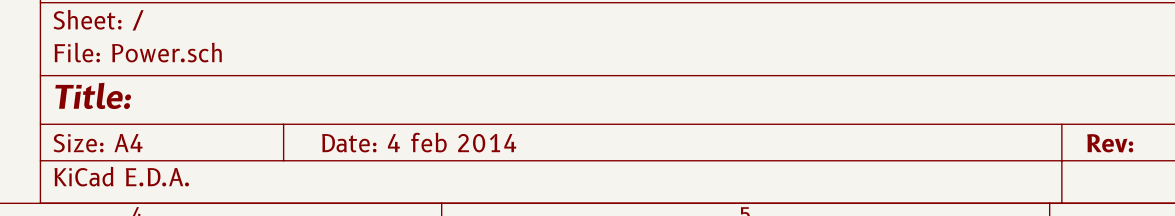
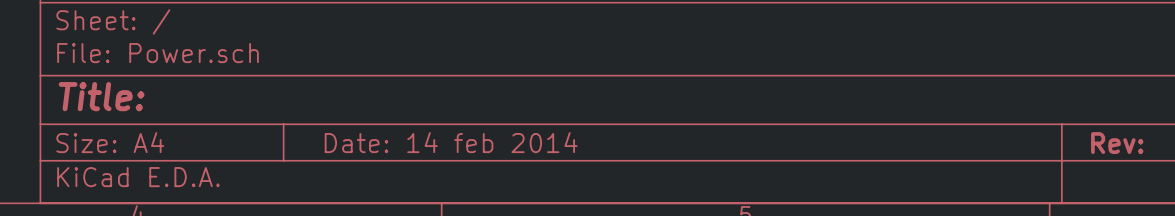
title block: Date: 4 feb 2014 (419, 142) -> Date: 14 feb 2014 (451, 142)

